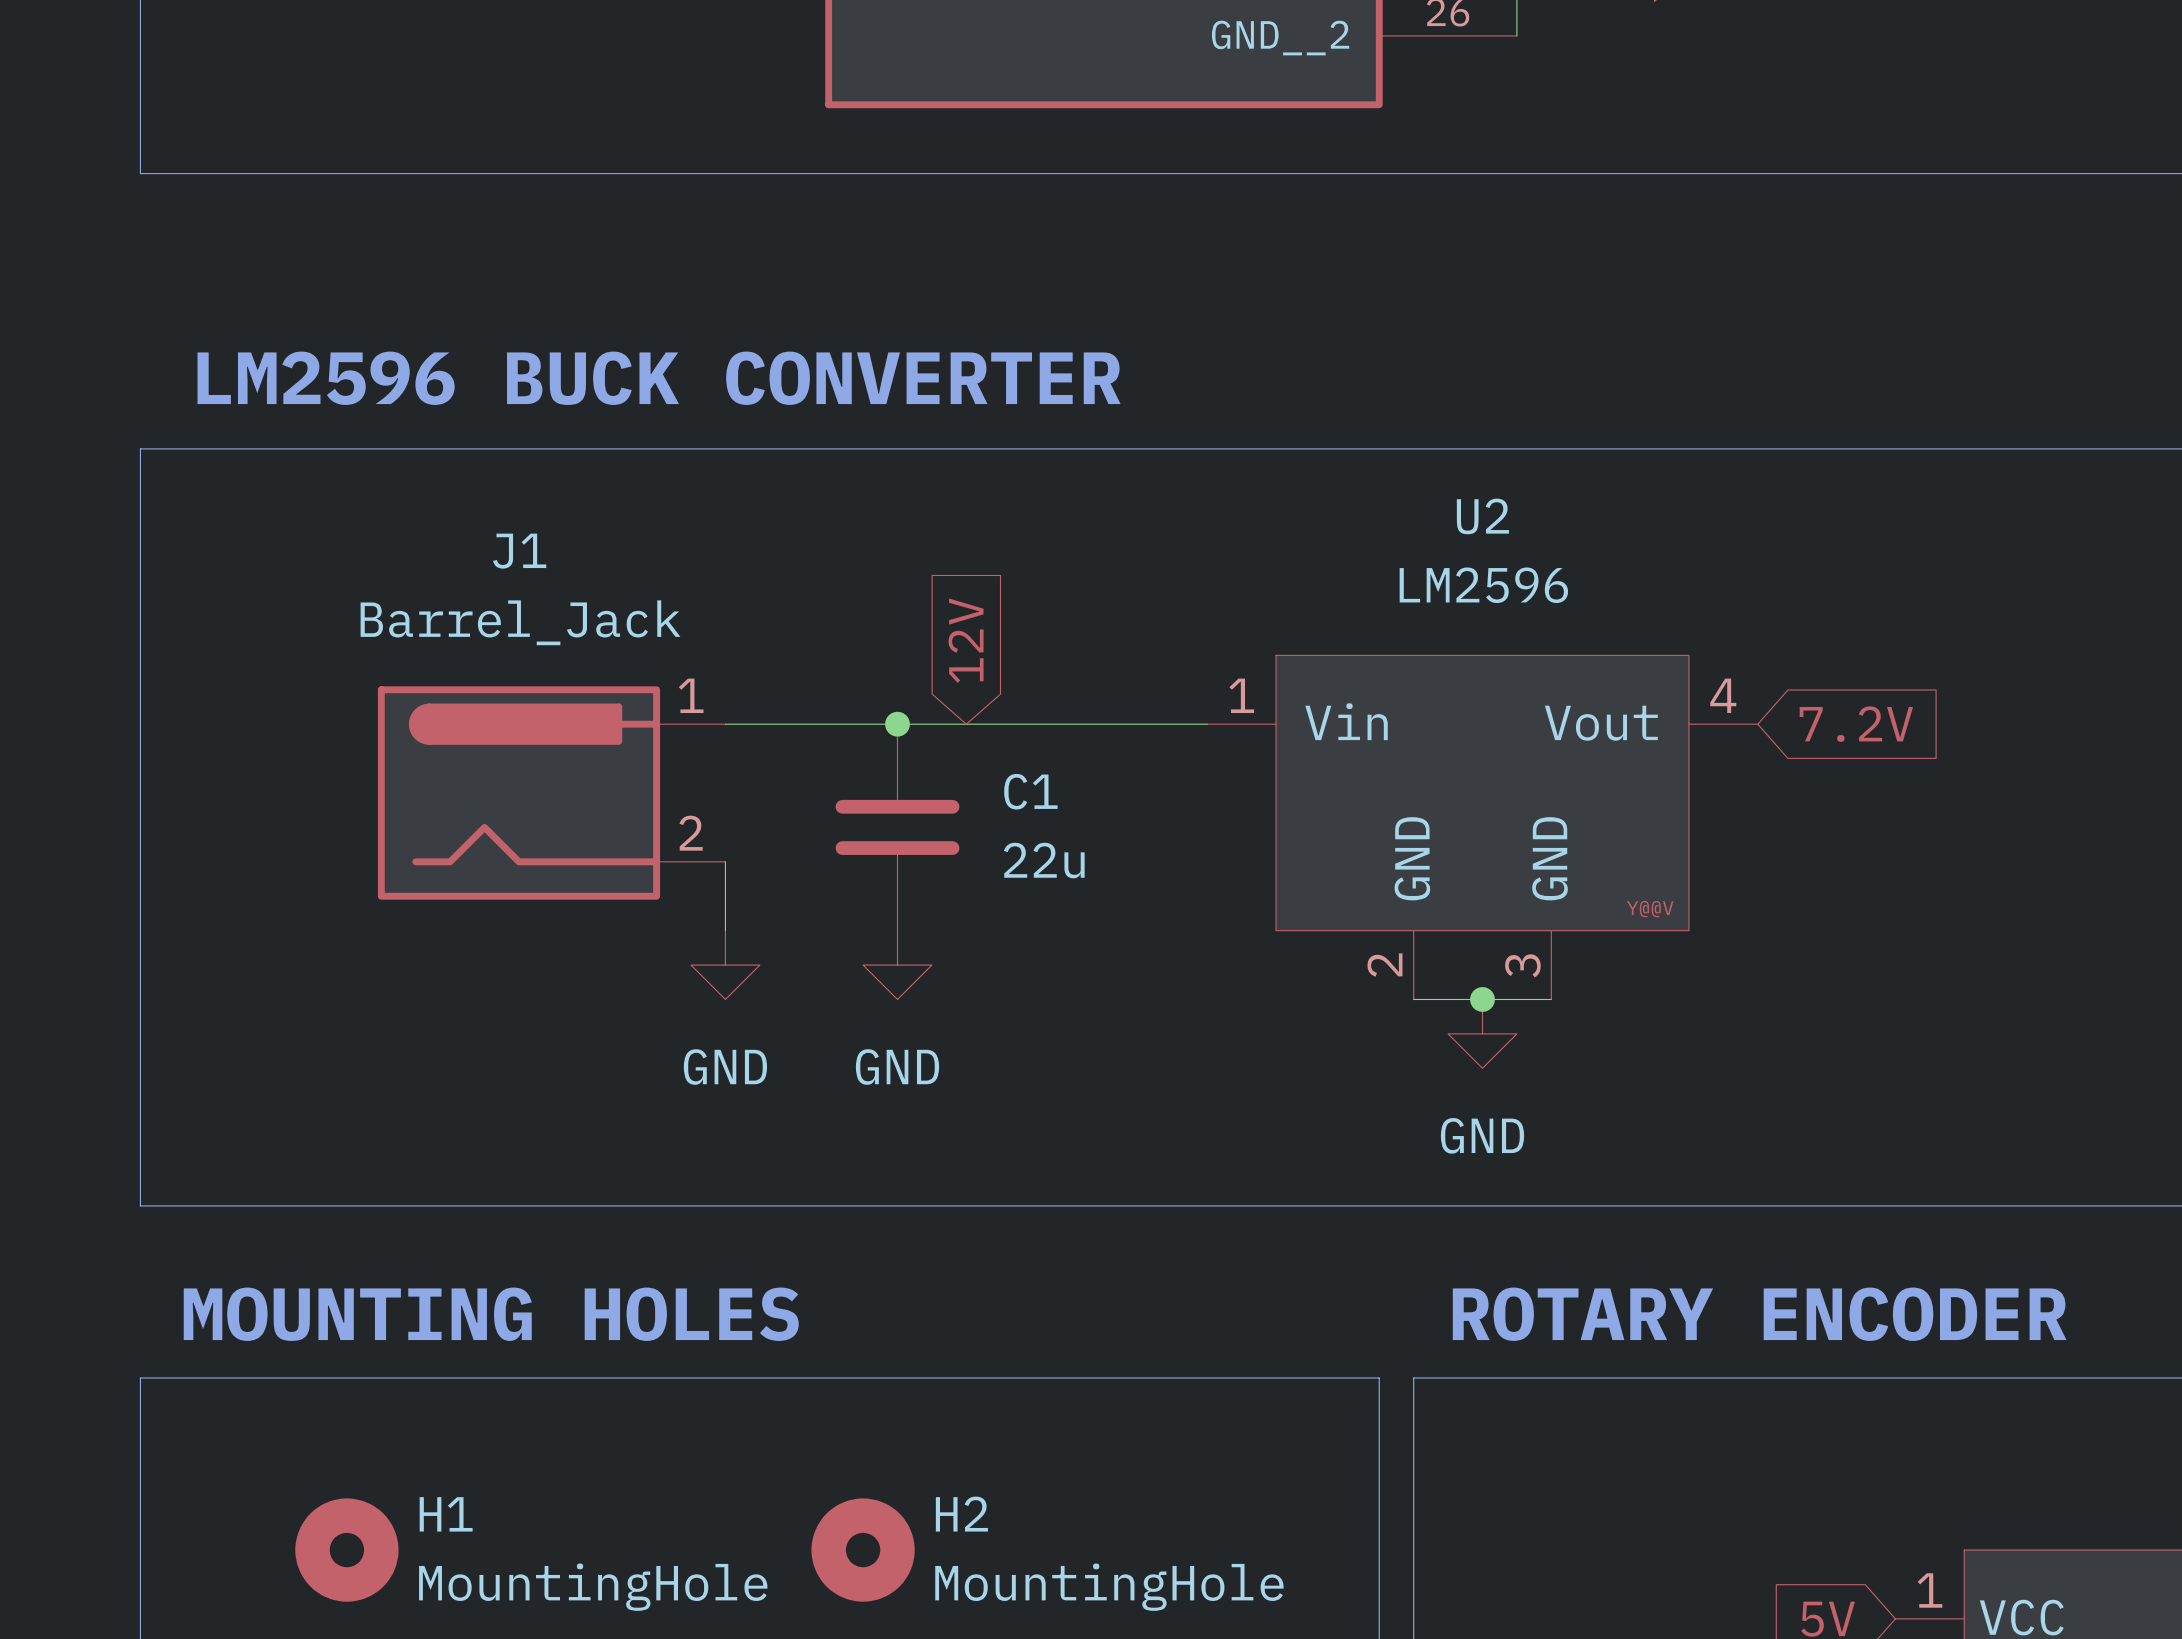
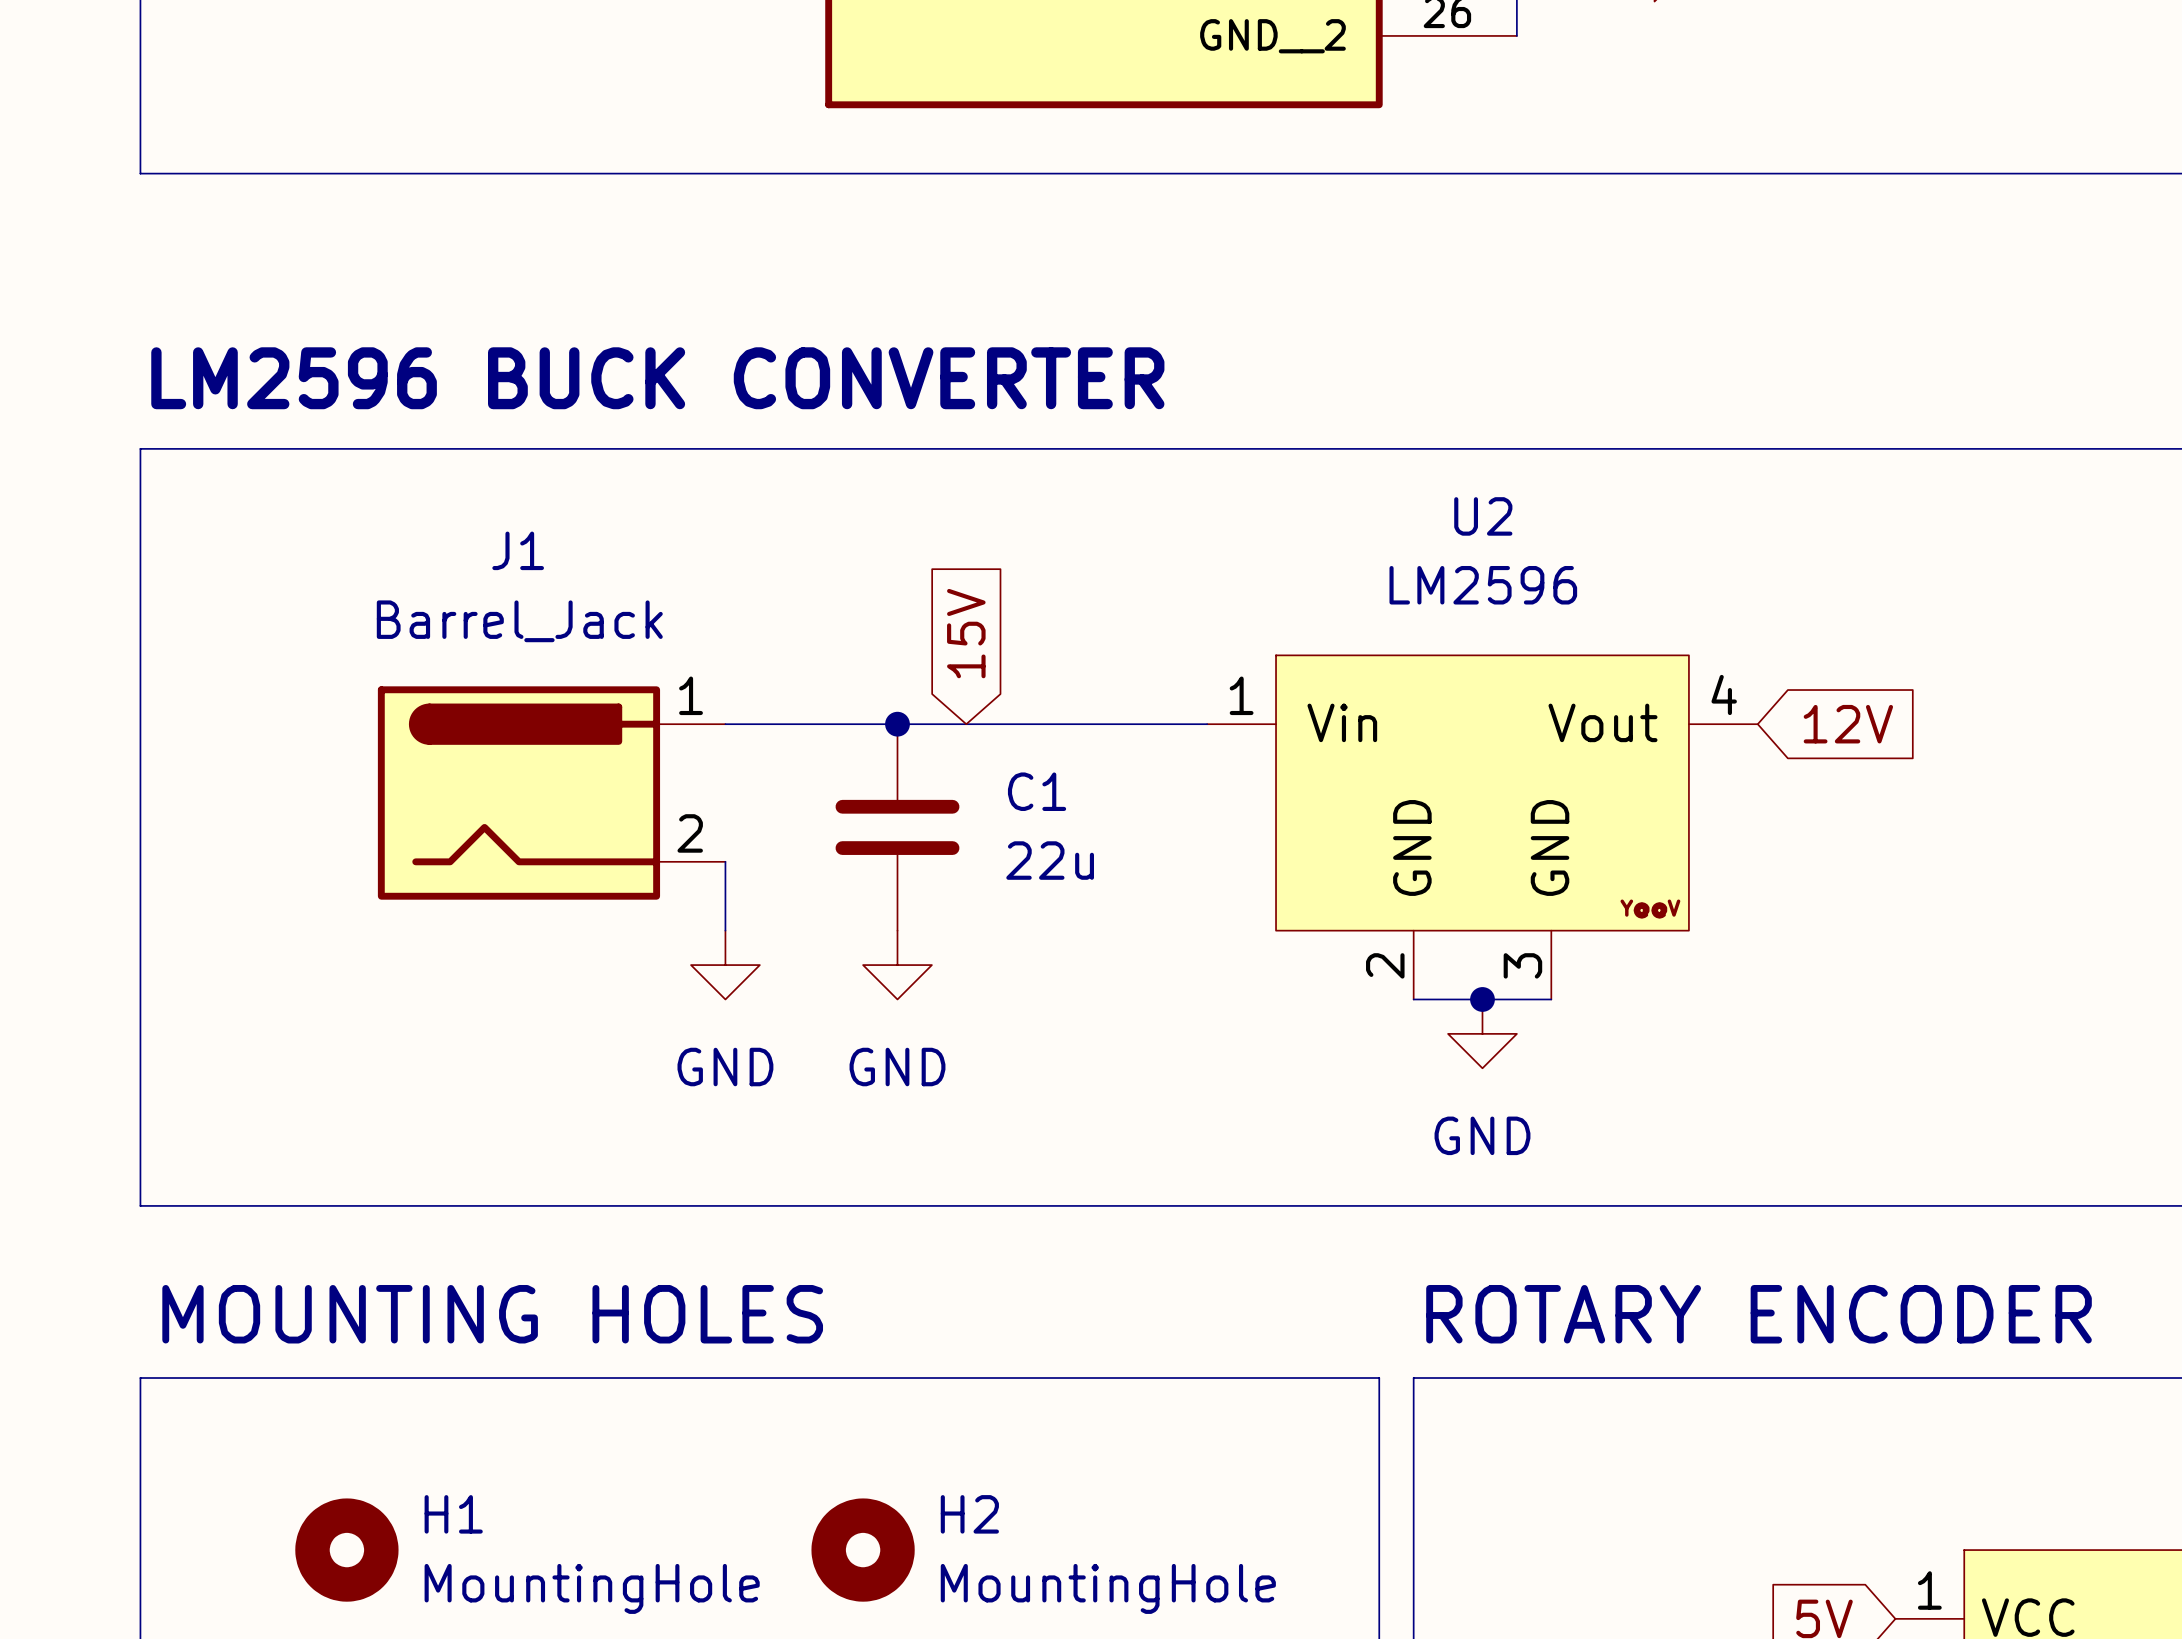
global label: 12V (966, 640) -> 15V (966, 633)
global label: 7.2V (1856, 724) -> 12V (1848, 724)

